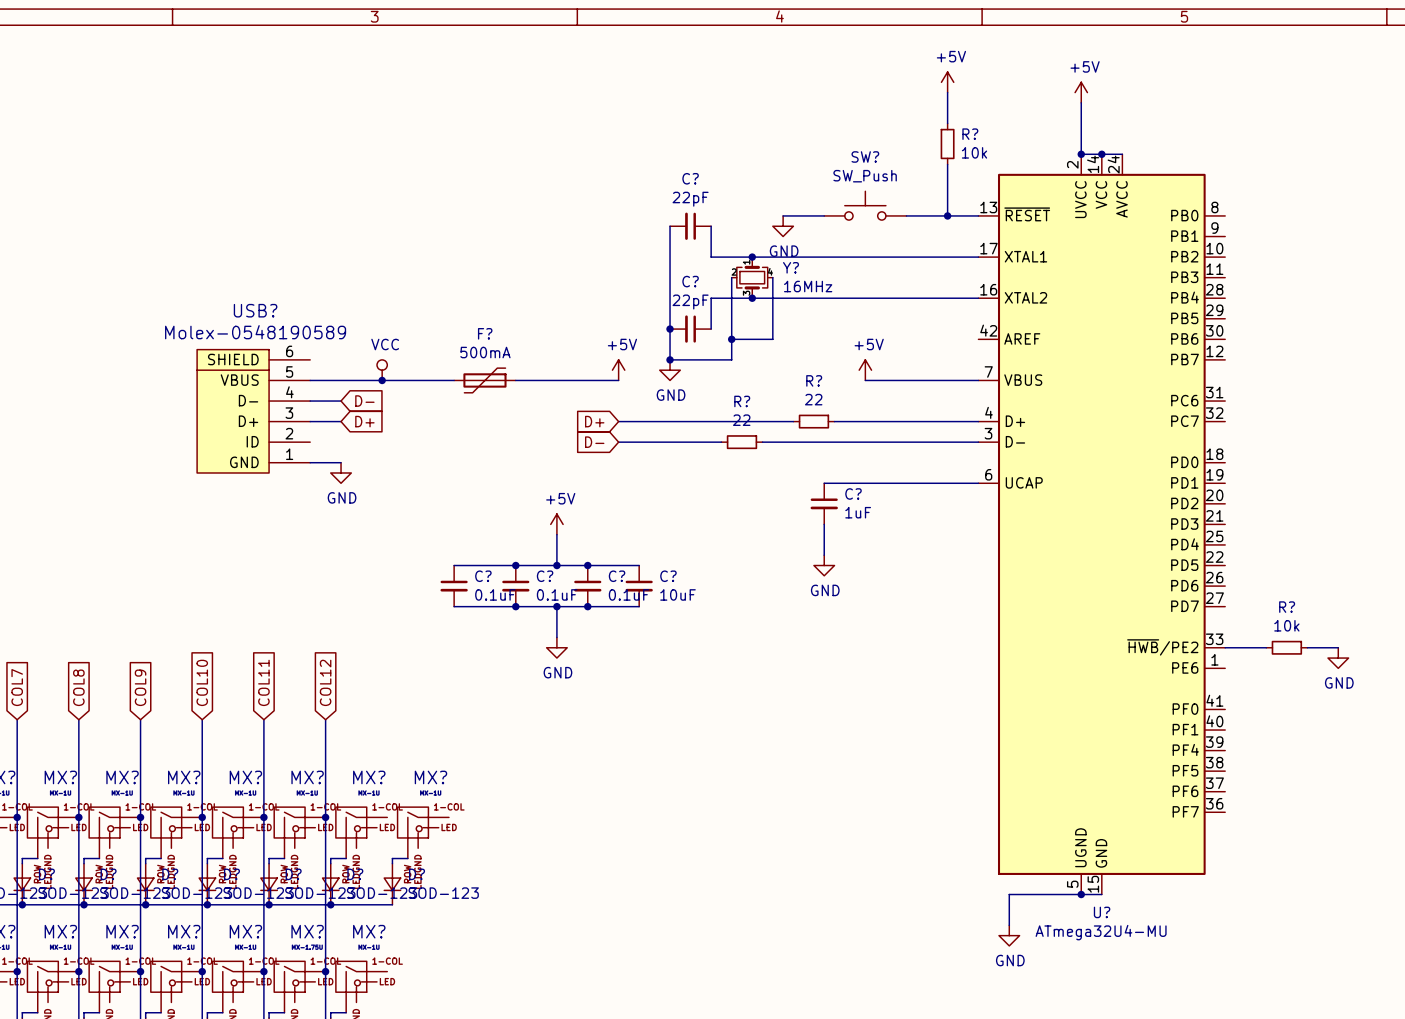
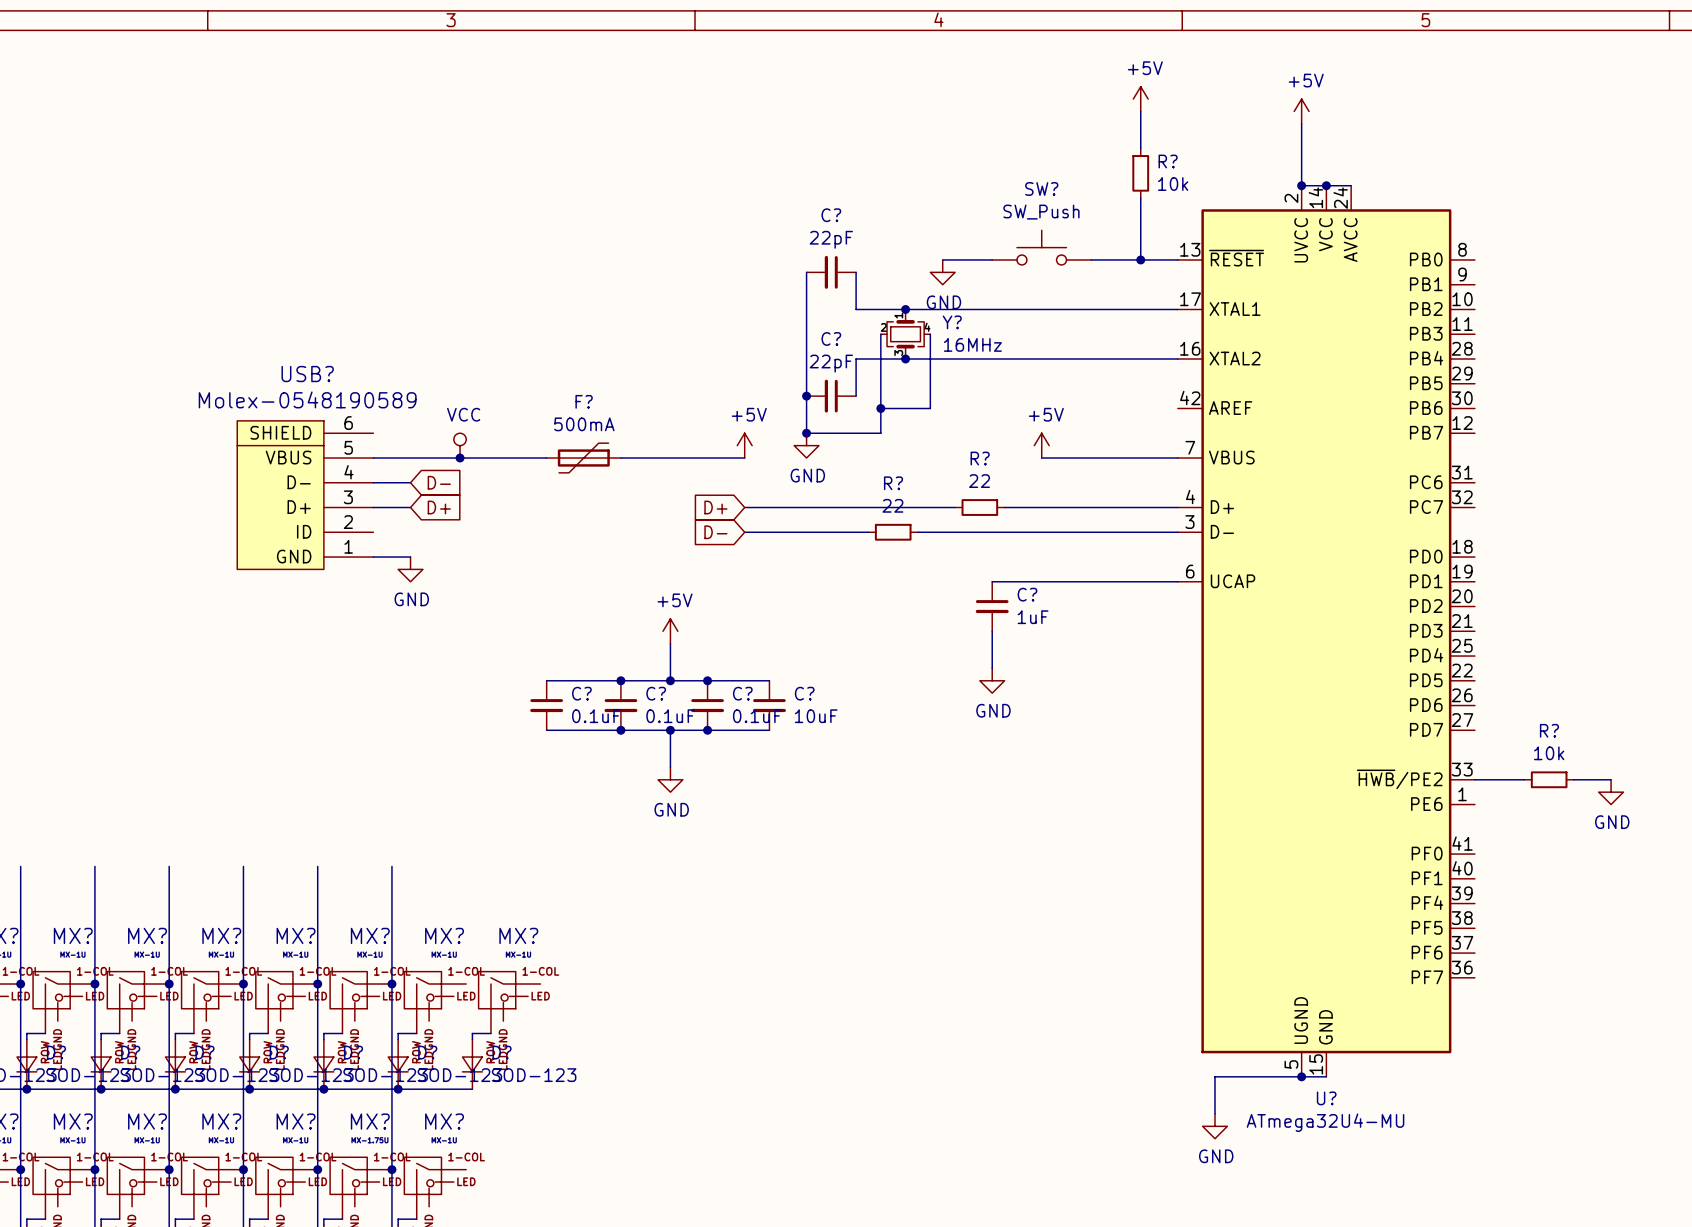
global label: COL10 (202, 682) -> none
global label: COL11 (263, 682) -> none
global label: COL12 (325, 682) -> none
global label: COL7 (17, 687) -> none
global label: COL8 (78, 687) -> none
global label: COL9 (140, 687) -> none

